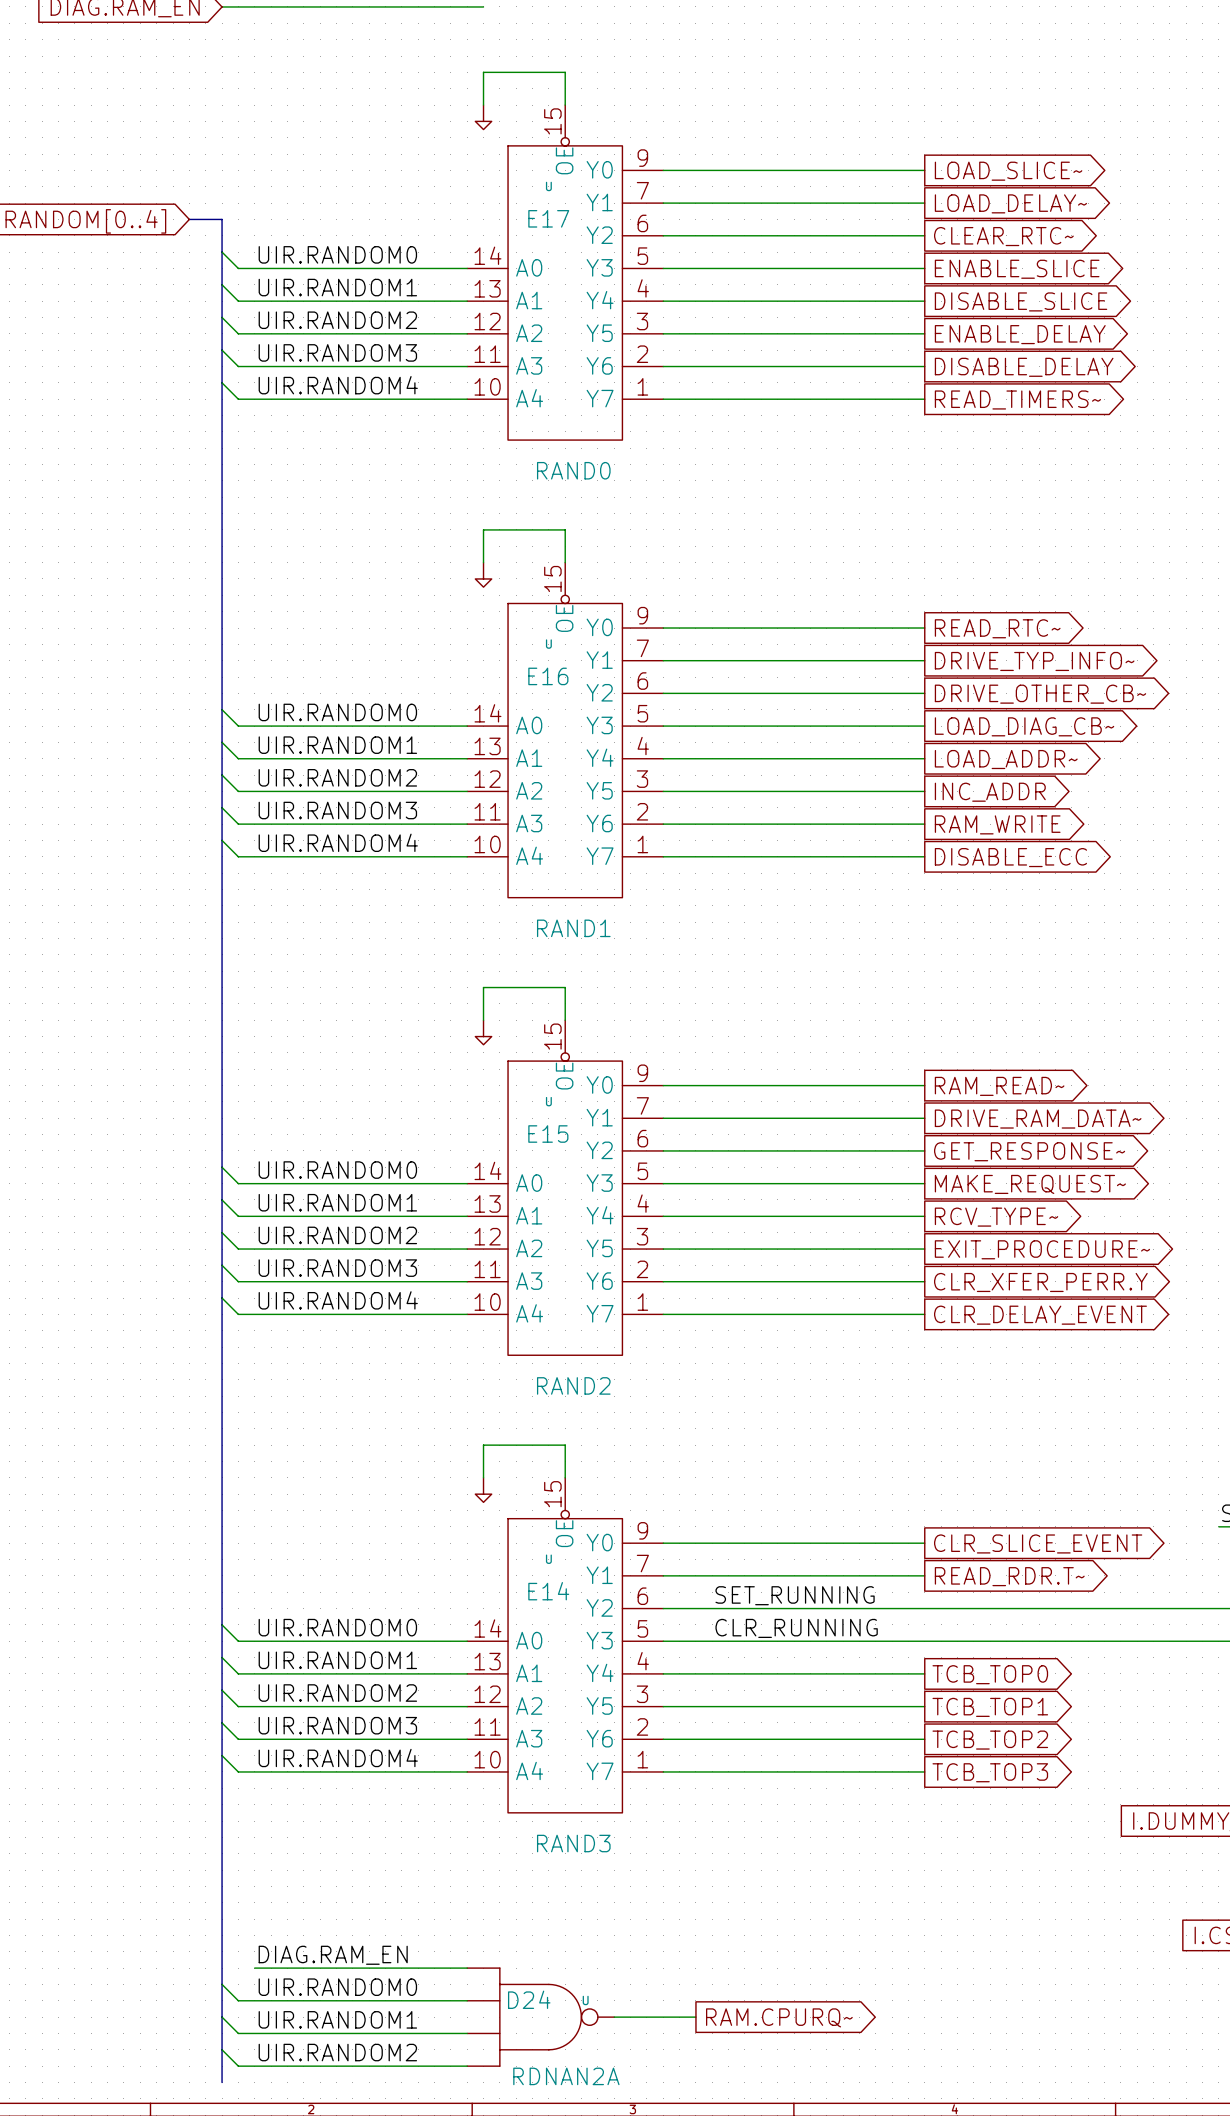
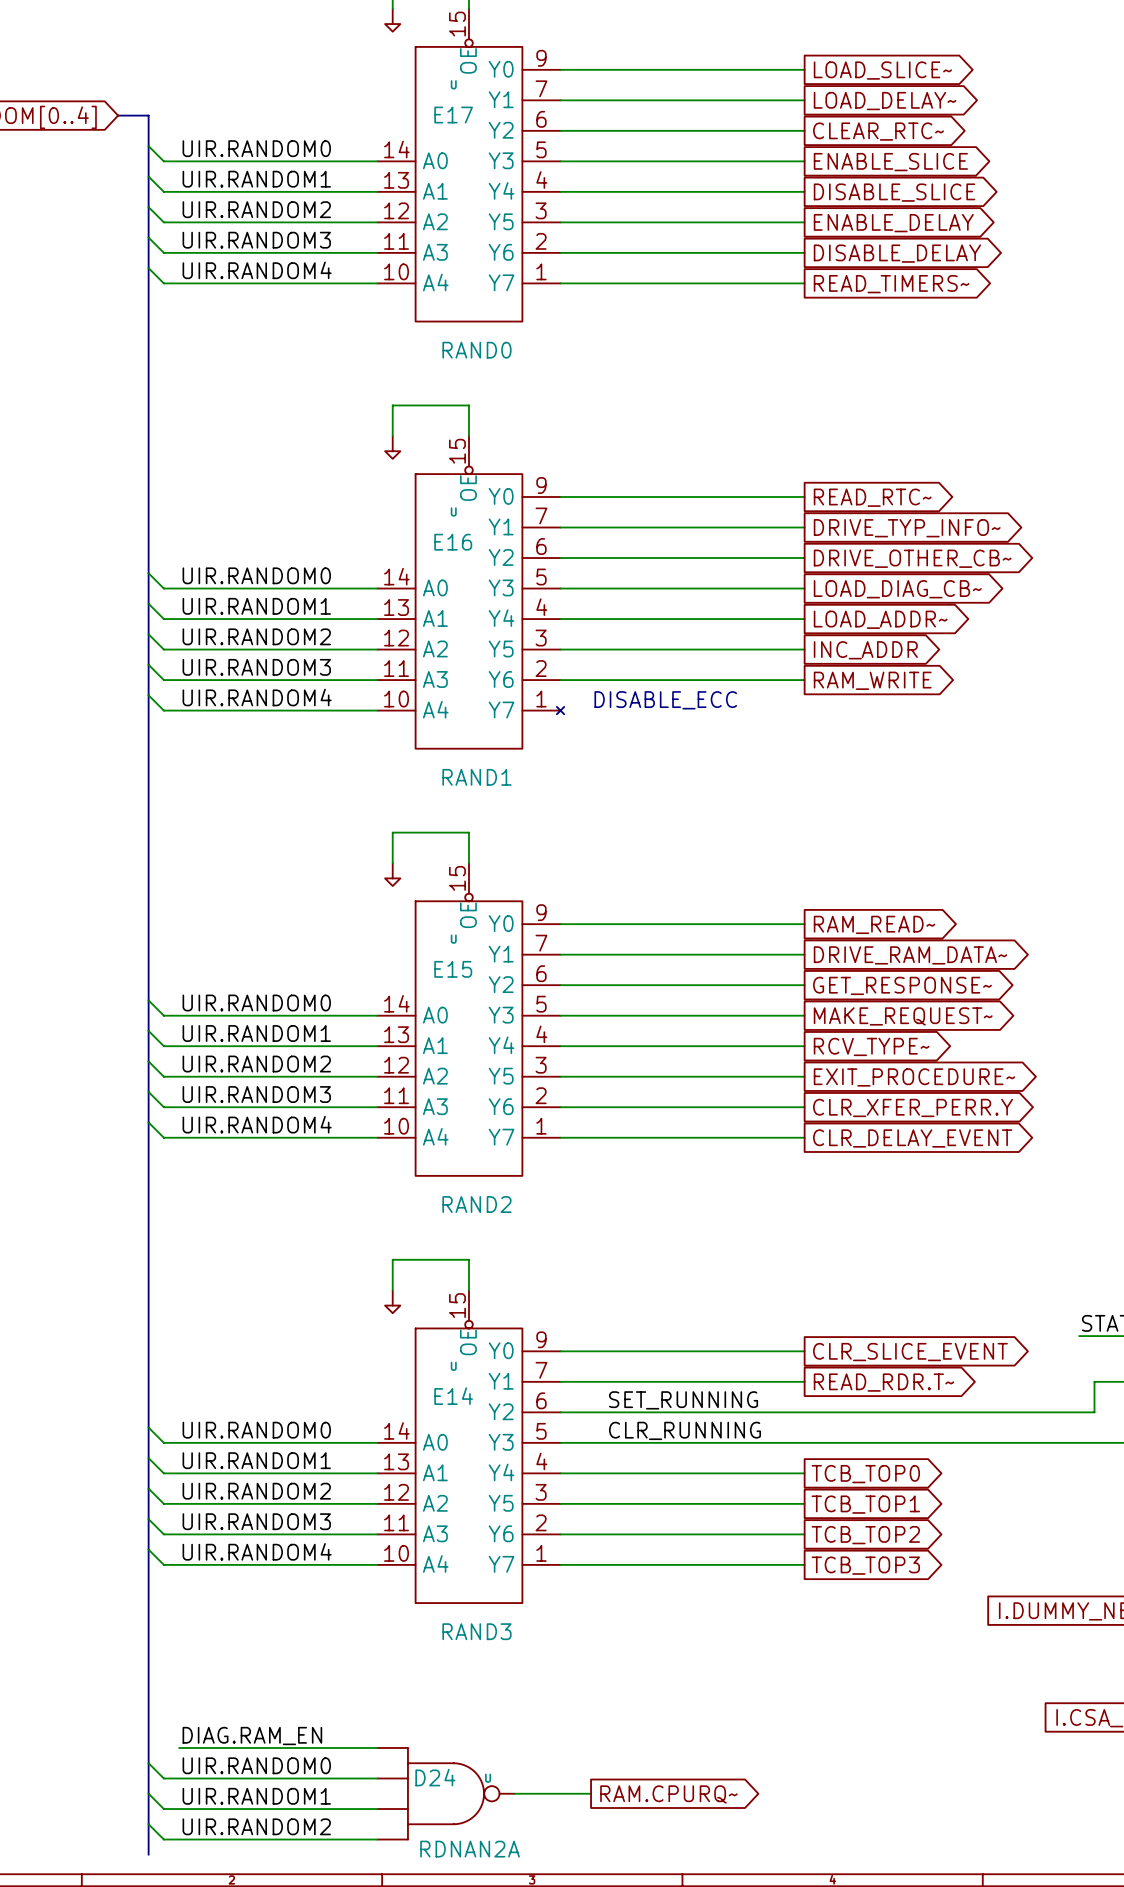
text: none -> DISABLE_ECC (665, 700)
wire: (663, 856) (924, 856) -> none
no-connect mark: none -> (560, 710)
global label: DISABLE_ECC (1010, 857) -> none

